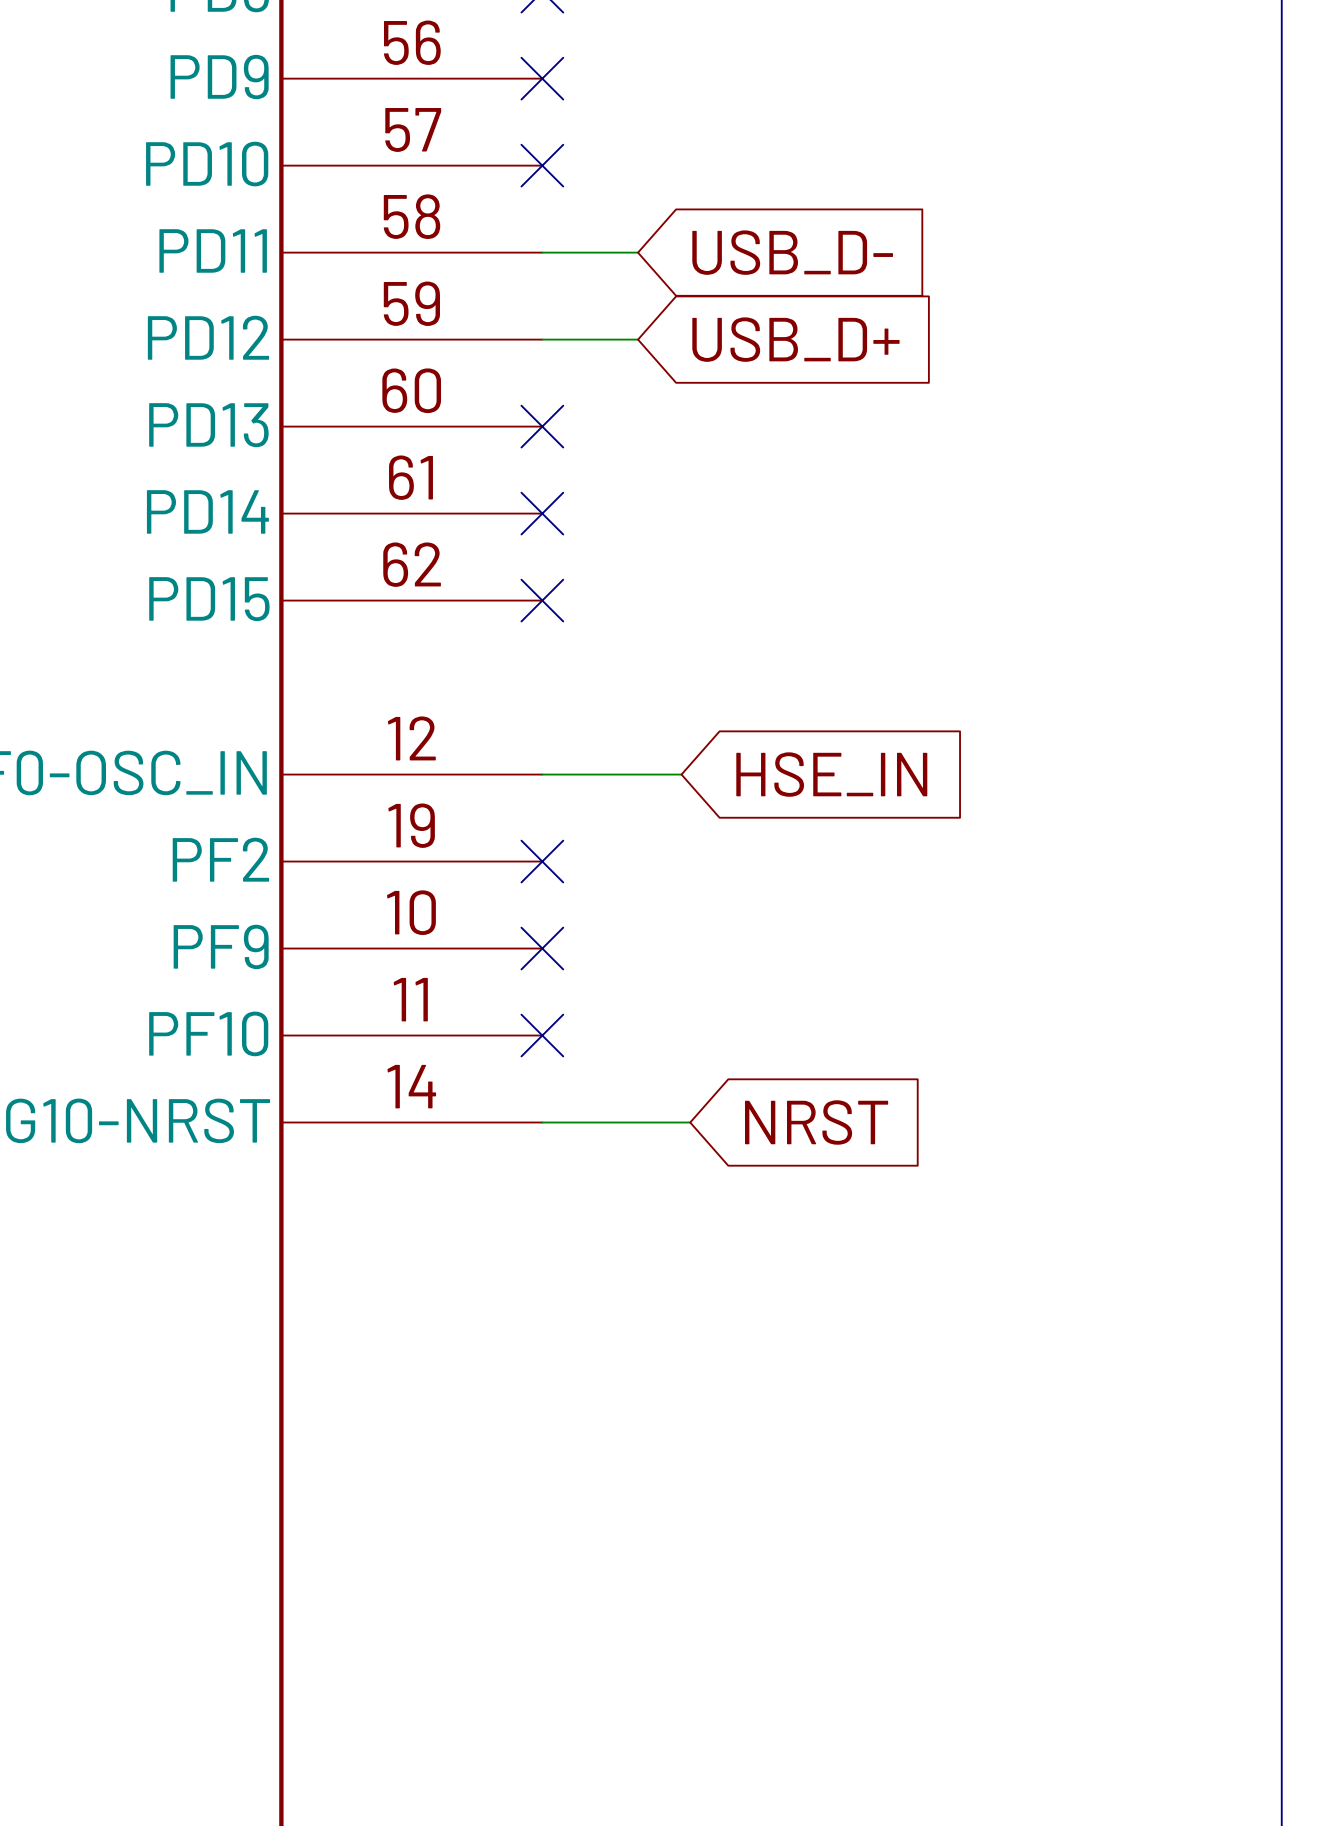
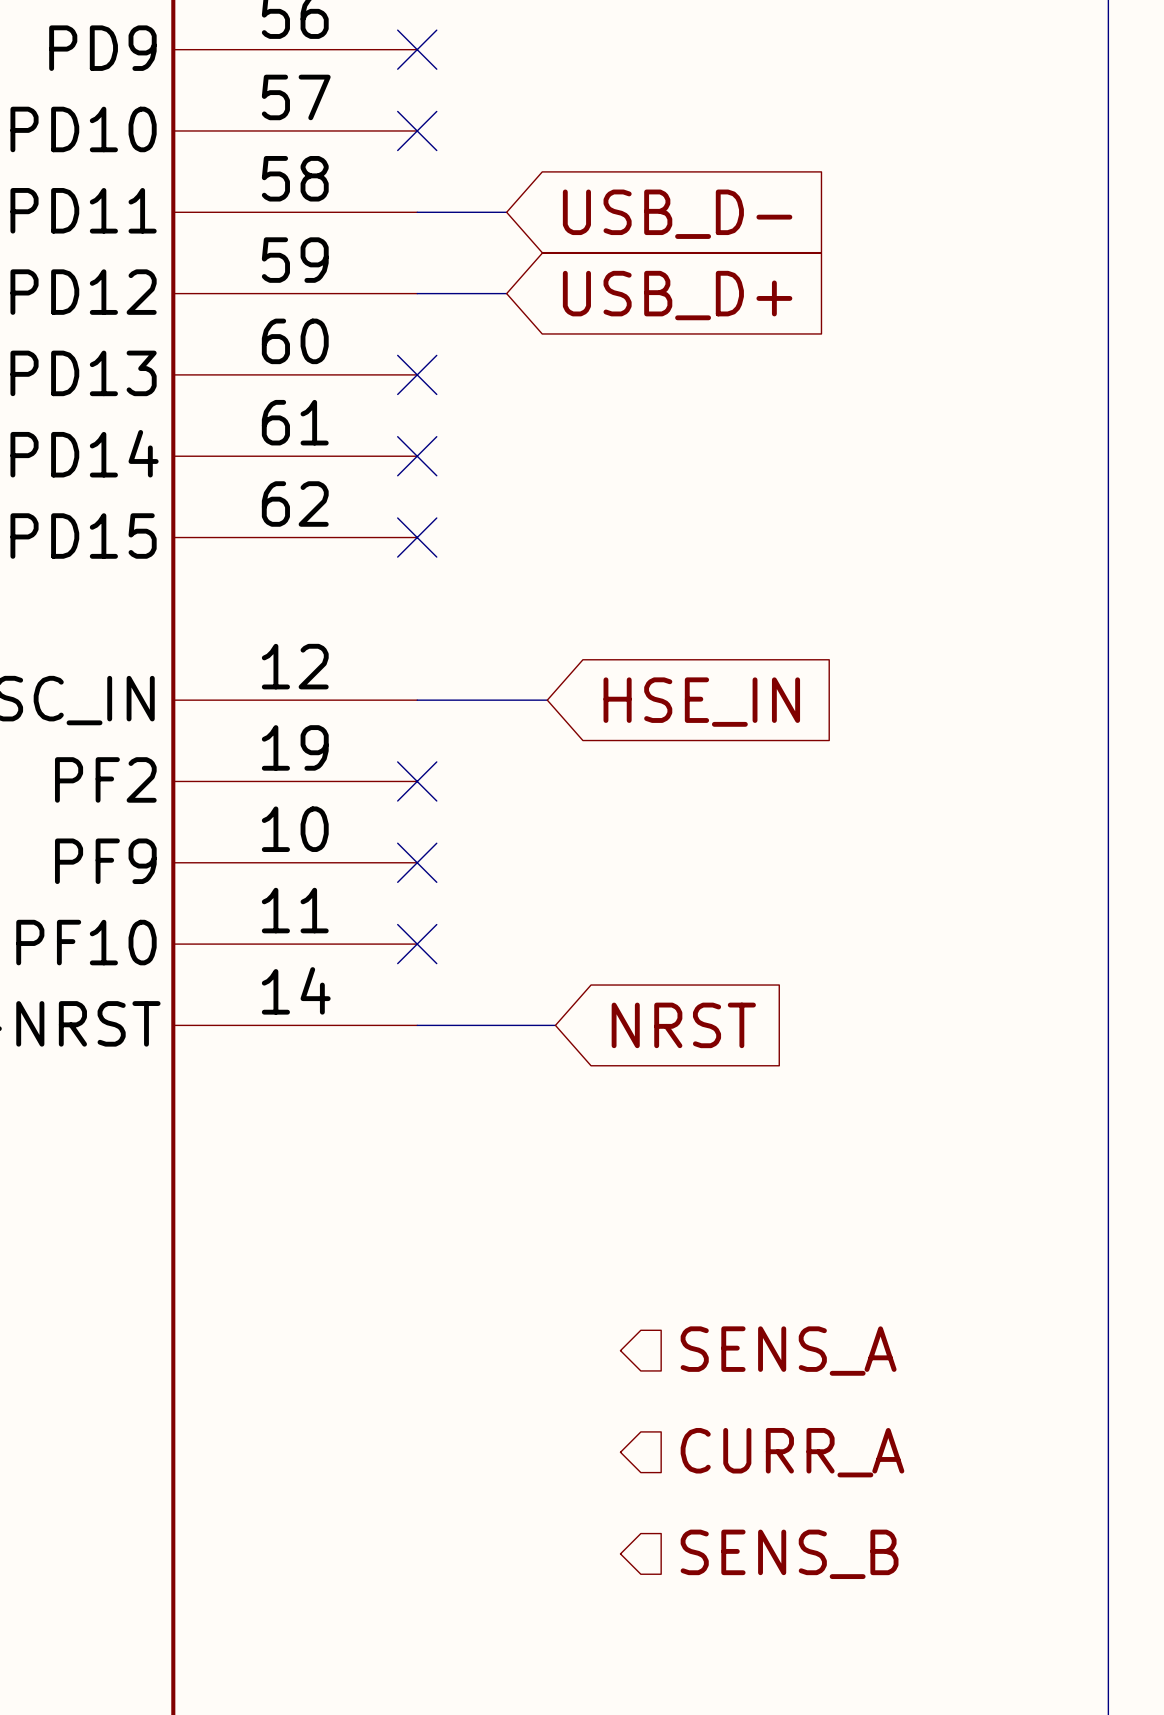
hierarchical label: none -> SENS_A (788, 1351)
hierarchical label: none -> CURR_A (792, 1452)
hierarchical label: none -> SENS_B (789, 1554)

